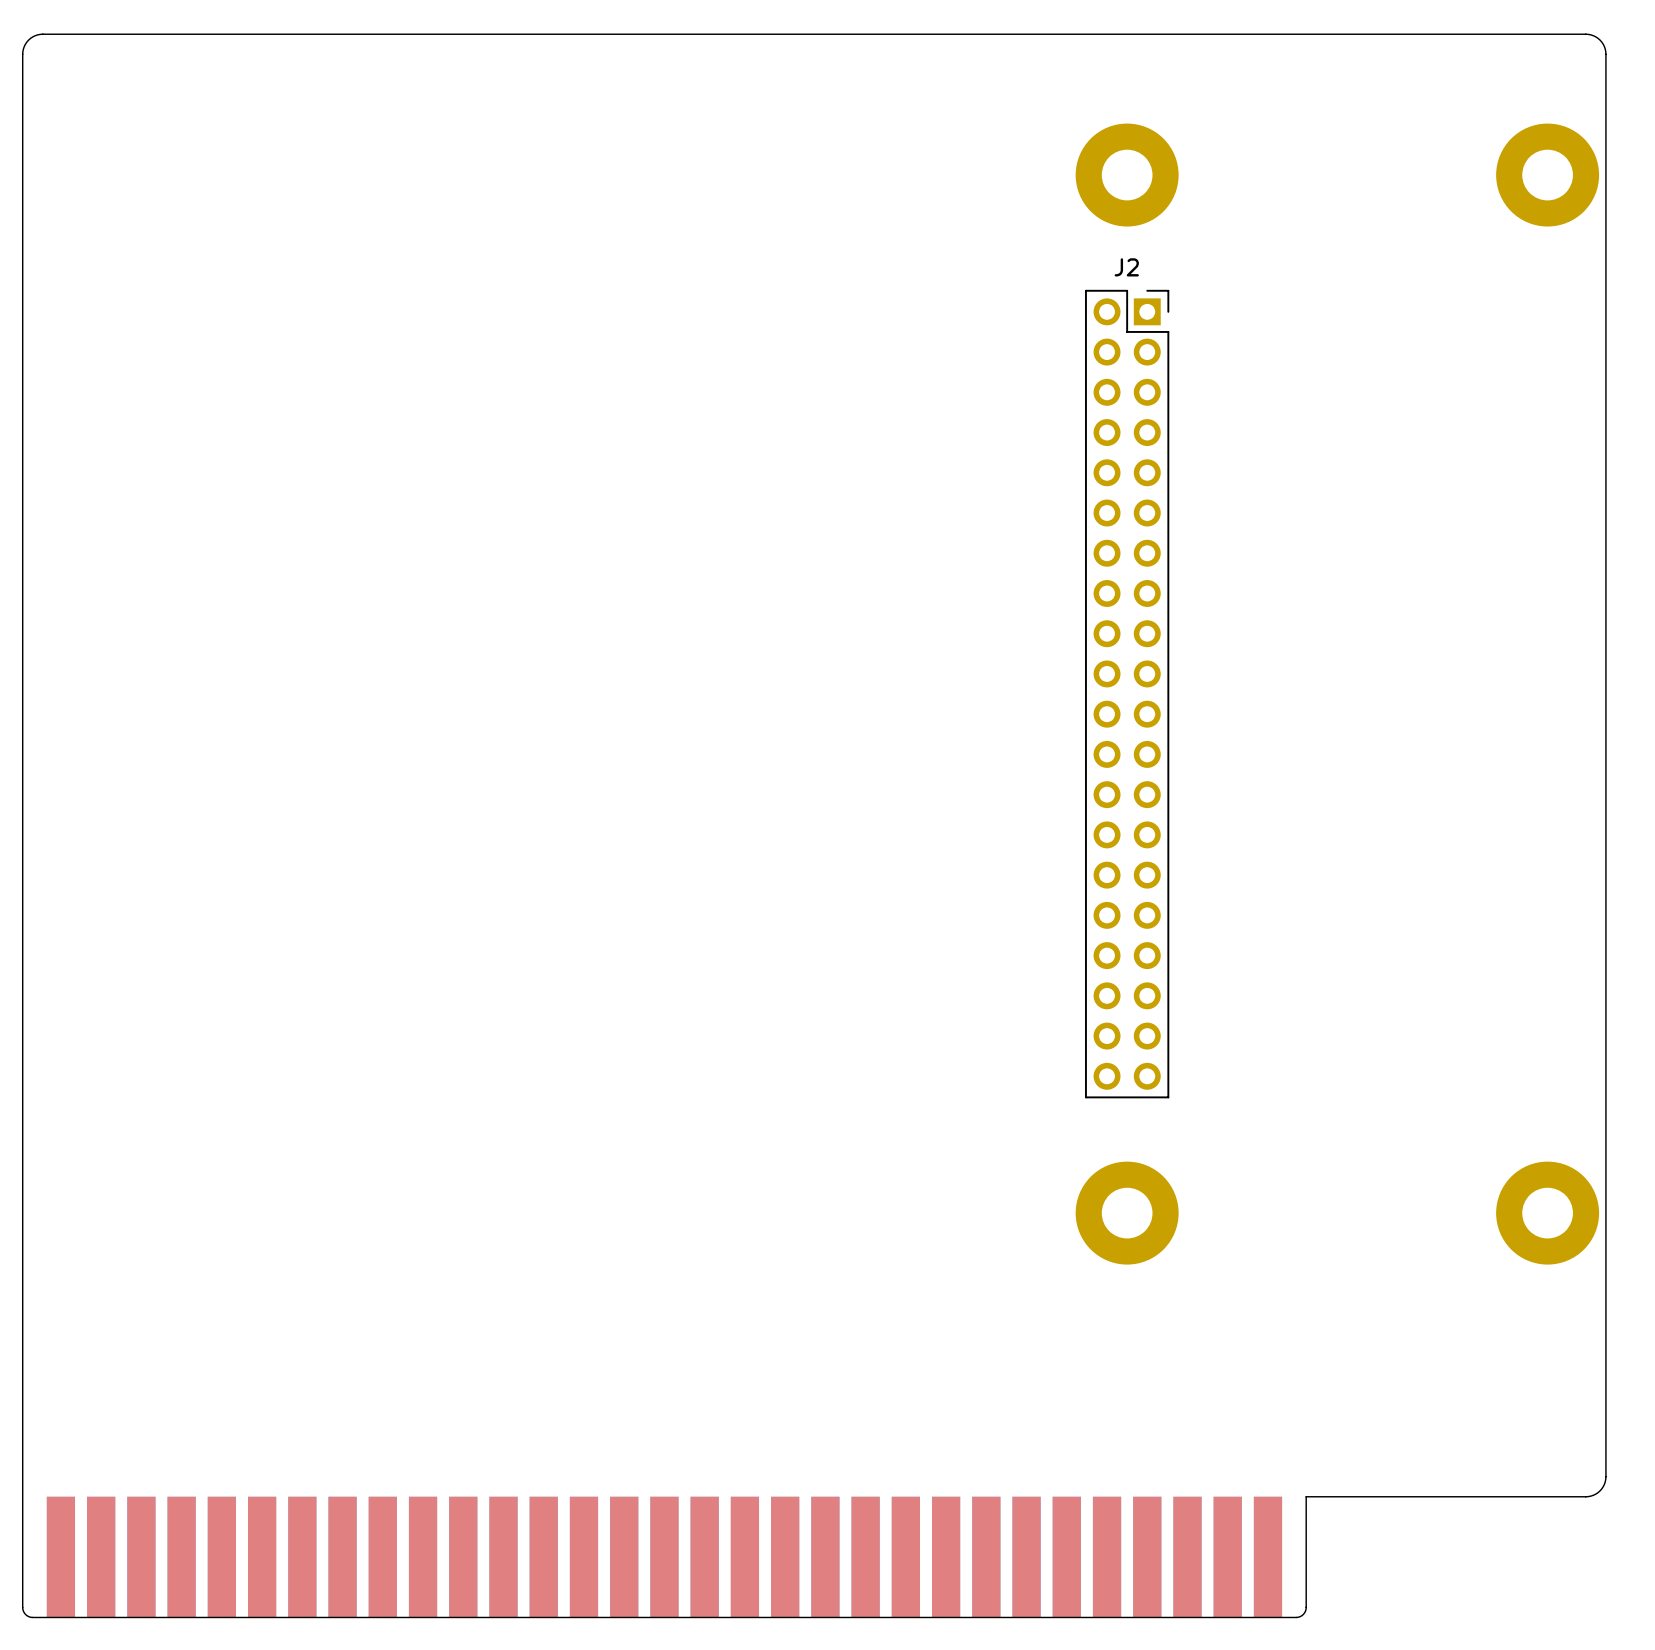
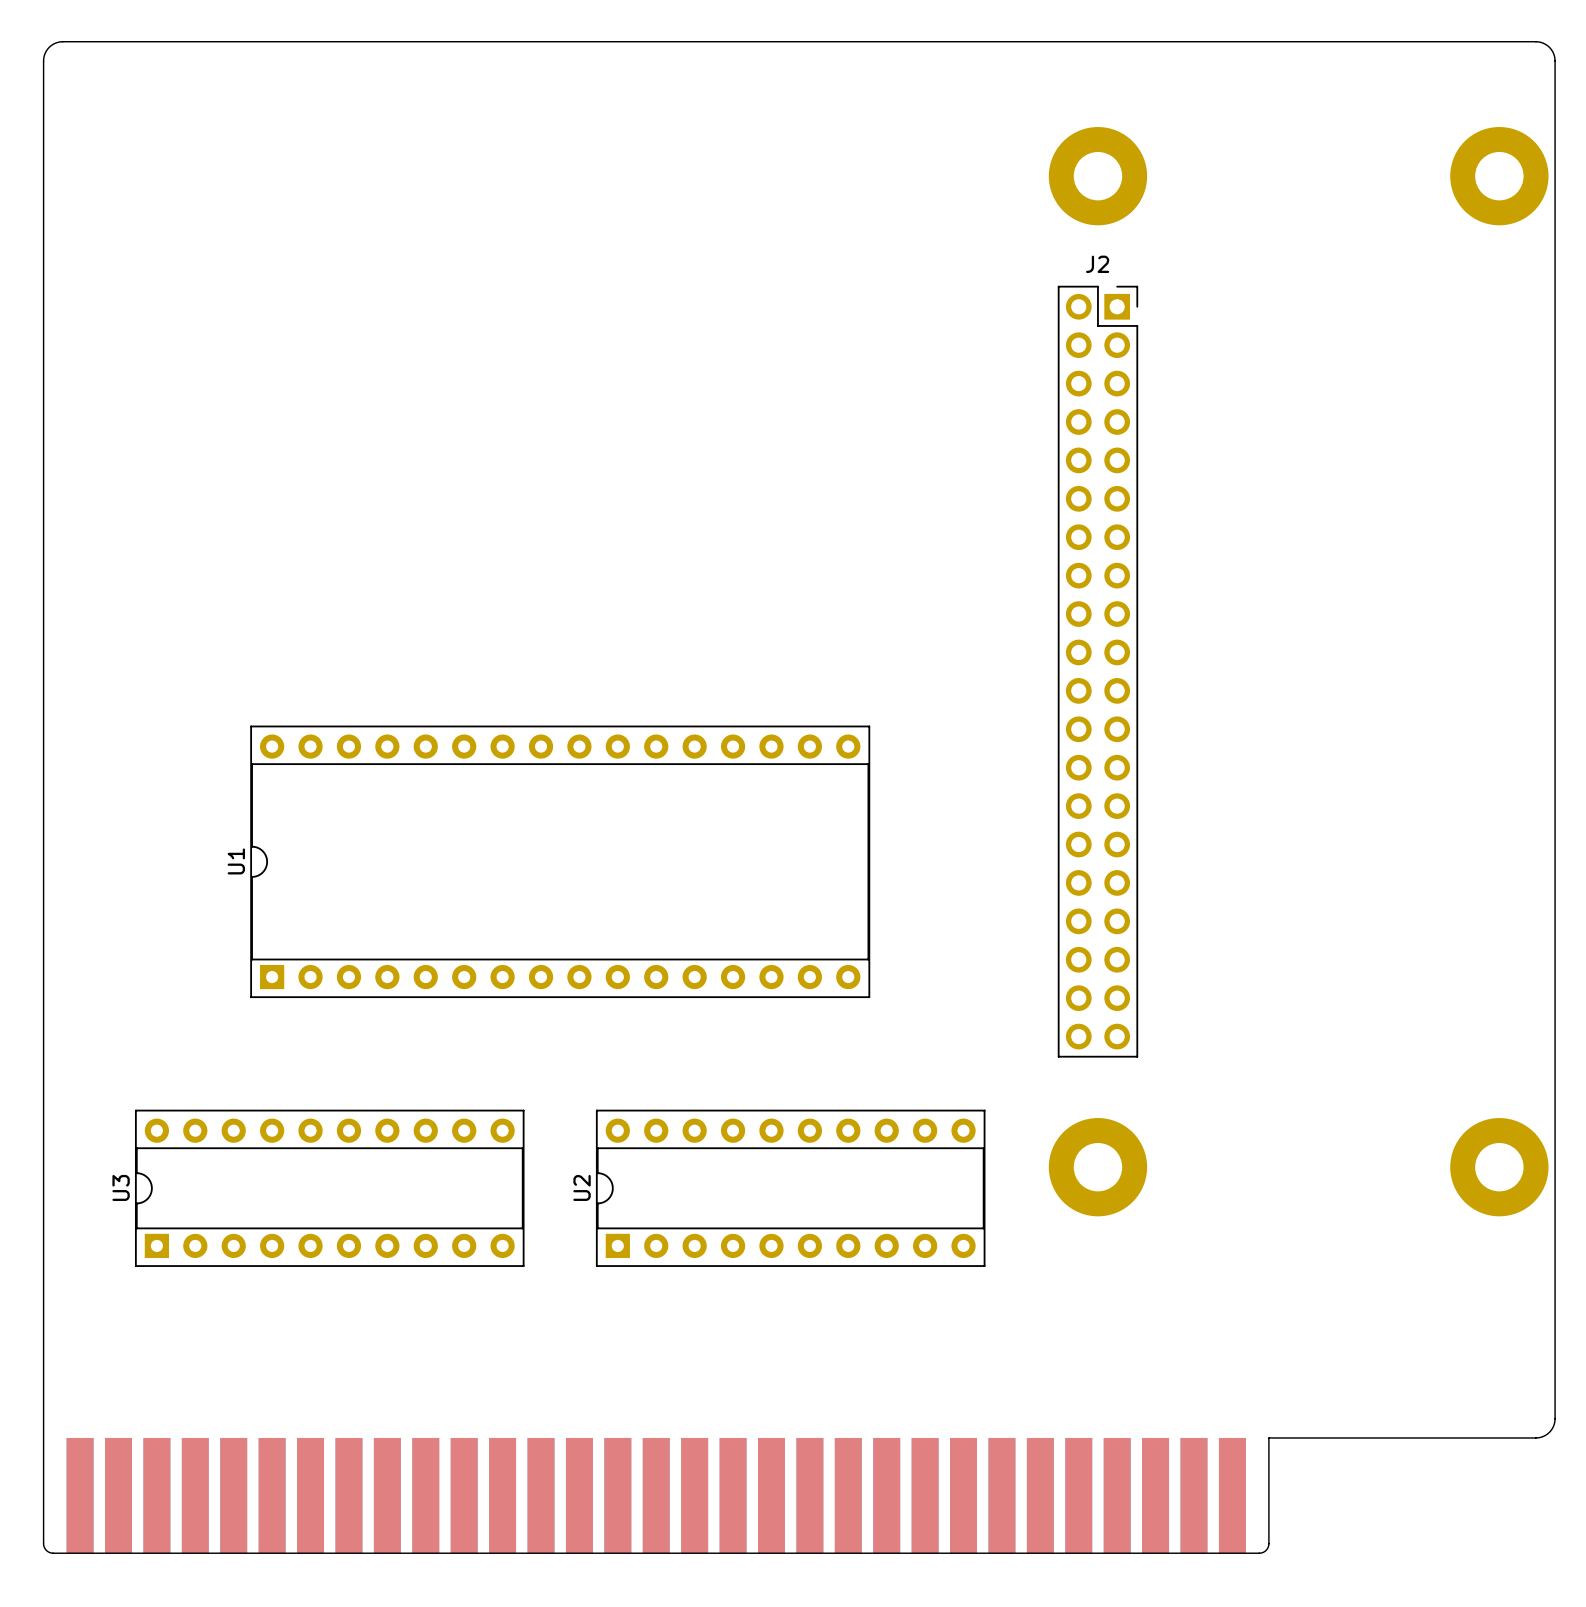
U1: none -> (560, 861)
U3: none -> (329, 1188)
U2: none -> (790, 1188)

